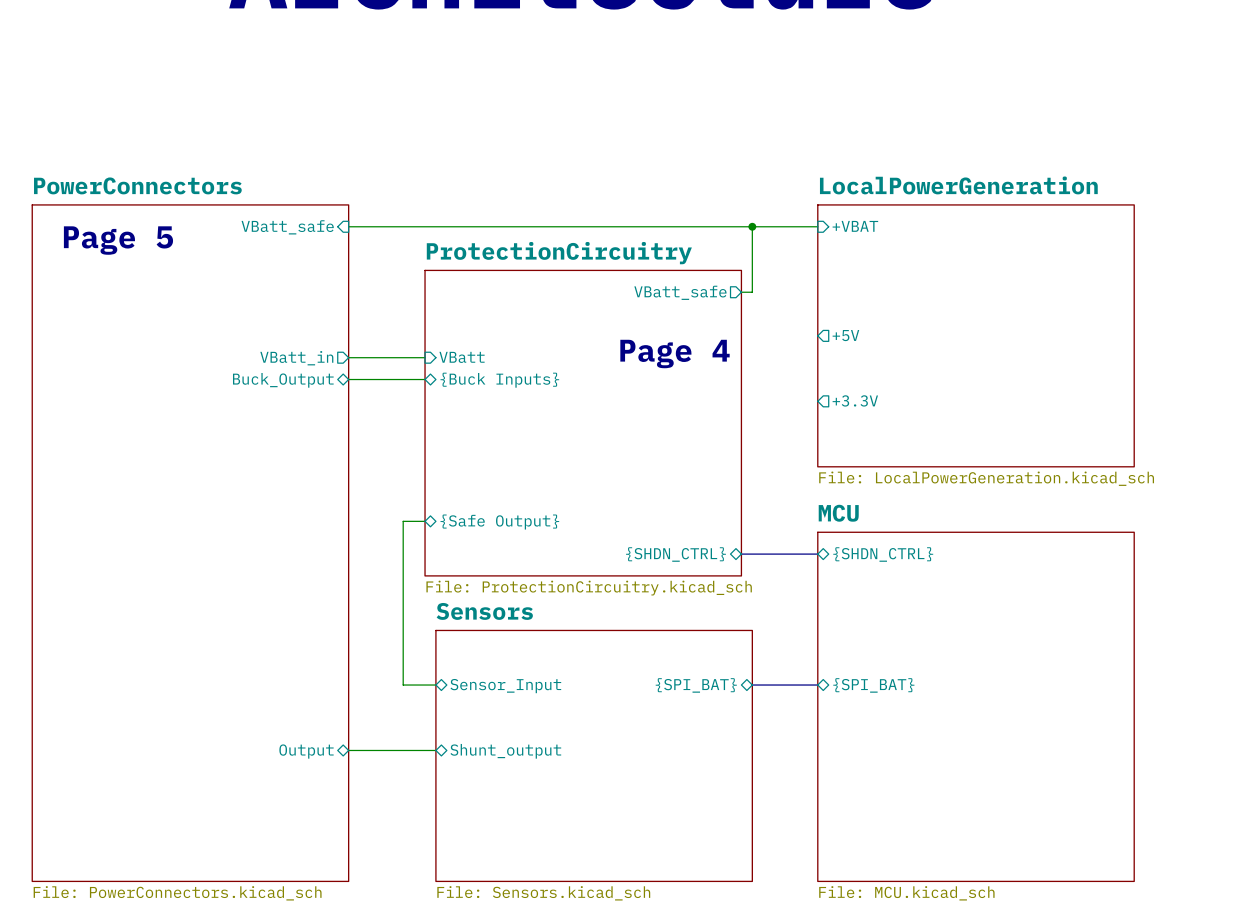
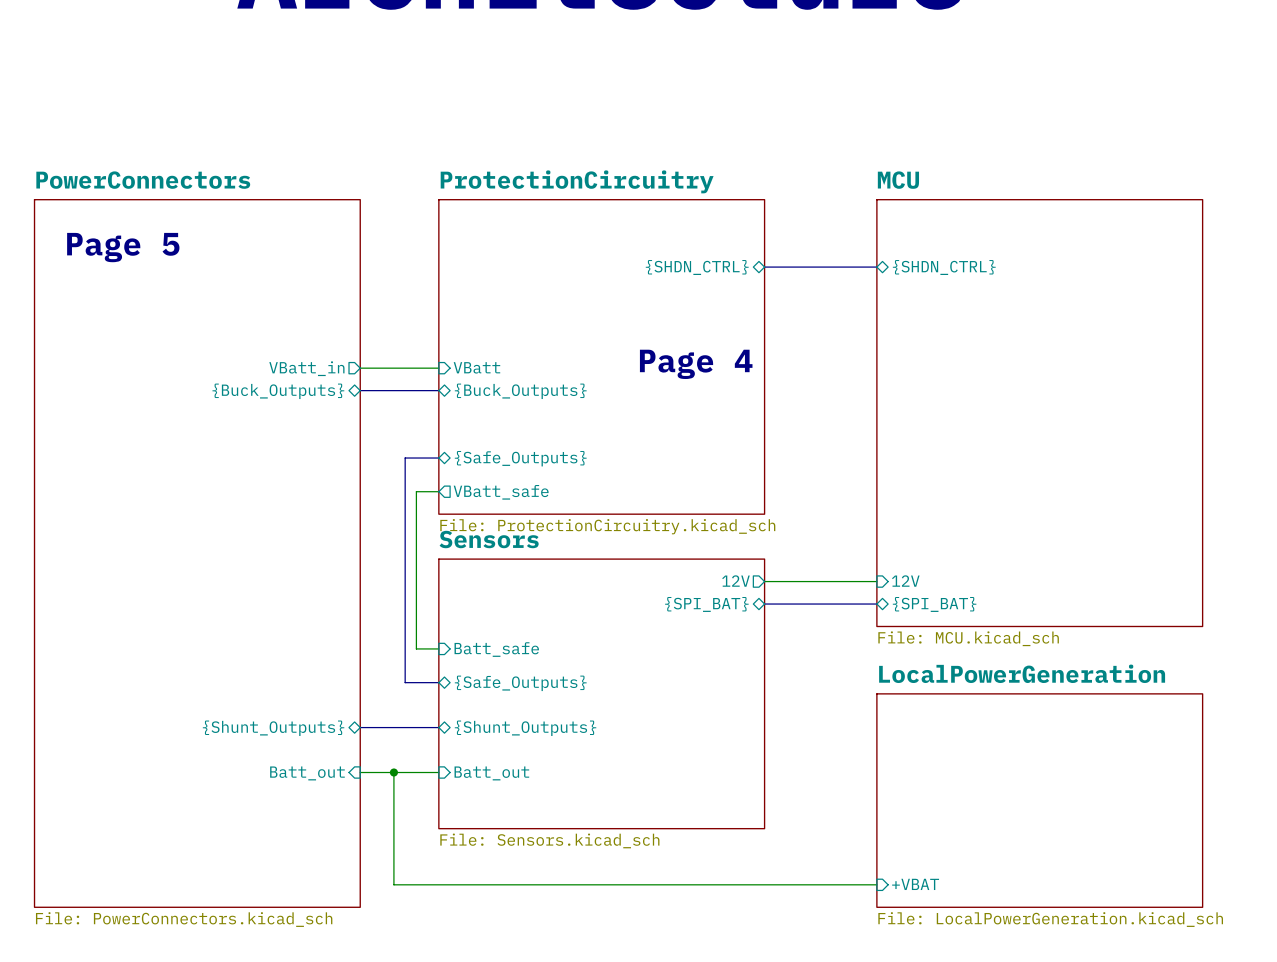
sheet PowerConnectors shape: [31, 204, 350, 883] -> [33, 199, 361, 908]
wire: (348, 226) (817, 226) -> none
wire: (752, 226) (752, 292) (741, 292) -> none
junction: (752, 226) -> none
sheet pin: +VBAT (855, 226) -> none
sheet pin: VBatt_safe (287, 227) -> none
sheet pin: none -> {SHDN_CTRL} (697, 267)
bus: none -> (764, 267) (876, 267)
sheet pin: none -> {SHDN_CTRL} (944, 267)
sheet pin: VBatt_safe (680, 292) -> none
sheet pin: +5V (845, 335) -> none
sheet LocalPowerGeneration: File: LocalPowerGeneration.kicad_sch (976, 335) -> none
bus: none -> (360, 390) (438, 390)
sheet pin: Buck_Output (283, 380) -> {Buck_Outputs} (278, 391)
sheet pin: {Buck Inputs} (499, 380) -> {Buck_Outputs} (520, 391)
sheet pin: +3.3V (855, 400) -> none
sheet MCU: none -> File: MCU.kicad_sch (1039, 413)
sheet ProtectionCircuitry position: (583, 423) -> (601, 356)
bus: none -> (438, 458) (405, 458) (405, 682) (438, 682)
sheet pin: none -> {Safe_Outputs} (520, 458)
sheet pin: none -> VBatt_safe (501, 492)
wire: (403, 521) (425, 521) -> (416, 536) (416, 491) (438, 491)
sheet pin: {Safe Output} (499, 522) -> none
sheet pin: {SHDN_CTRL} (675, 554) -> none
bus: (741, 554) (817, 554) -> none
sheet pin: {SHDN_CTRL} (883, 554) -> none
sheet pin: none -> 12V (735, 581)
sheet pin: none -> 12V (905, 581)
wire: none -> (764, 581) (876, 581)
bus: none -> (764, 604) (876, 604)
sheet pin: none -> {SPI_BAT} (706, 604)
sheet pin: none -> {SPI_BAT} (934, 604)
wire: (403, 630) (403, 685) (435, 685) -> (416, 648) (438, 648)
sheet pin: none -> Batt_safe (496, 649)
sheet pin: none -> {Safe_Outputs} (520, 683)
sheet Sensors: none -> File: Sensors.kicad_sch (601, 693)
sheet pin: {SPI_BAT} (696, 685) -> none
bus: (752, 685) (817, 685) -> none
sheet pin: {SPI_BAT} (873, 685) -> none
sheet pin: Sensor_Input (505, 686) -> none
bus: none -> (360, 727) (438, 727)
sheet MCU: File: MCU.kicad_sch (976, 706) -> none
sheet pin: none -> {Shunt_Outputs} (273, 728)
sheet pin: none -> {Shunt_Outputs} (525, 728)
wire: none -> (393, 772) (393, 884) (876, 884)
junction: none -> (393, 772)
wire: (425, 750) (435, 750) -> none
sheet pin shape: bidirectional (306, 751) -> input (307, 773)
sheet pin: Output (306, 751) -> Batt_out (307, 773)
sheet pin: none -> Batt_out (491, 773)
sheet pin: Shunt_output (505, 751) -> none
sheet Sensors: File: Sensors.kicad_sch (594, 755) -> none
sheet LocalPowerGeneration: none -> File: LocalPowerGeneration.kicad_sch (1039, 800)
sheet pin: none -> +VBAT (915, 884)

